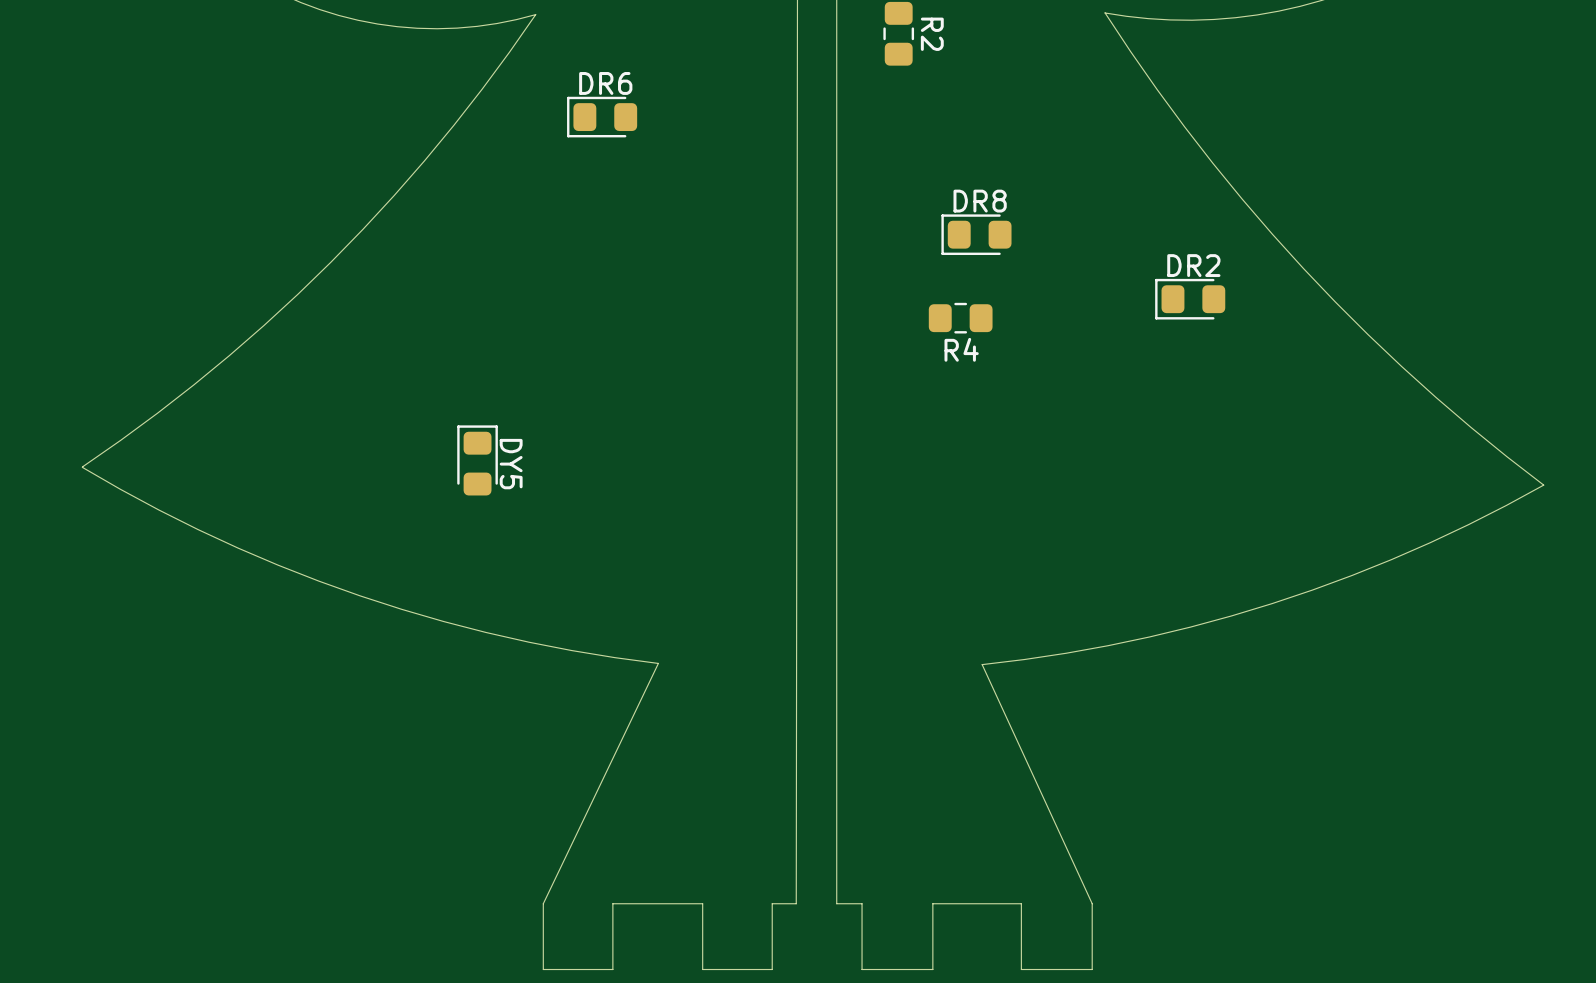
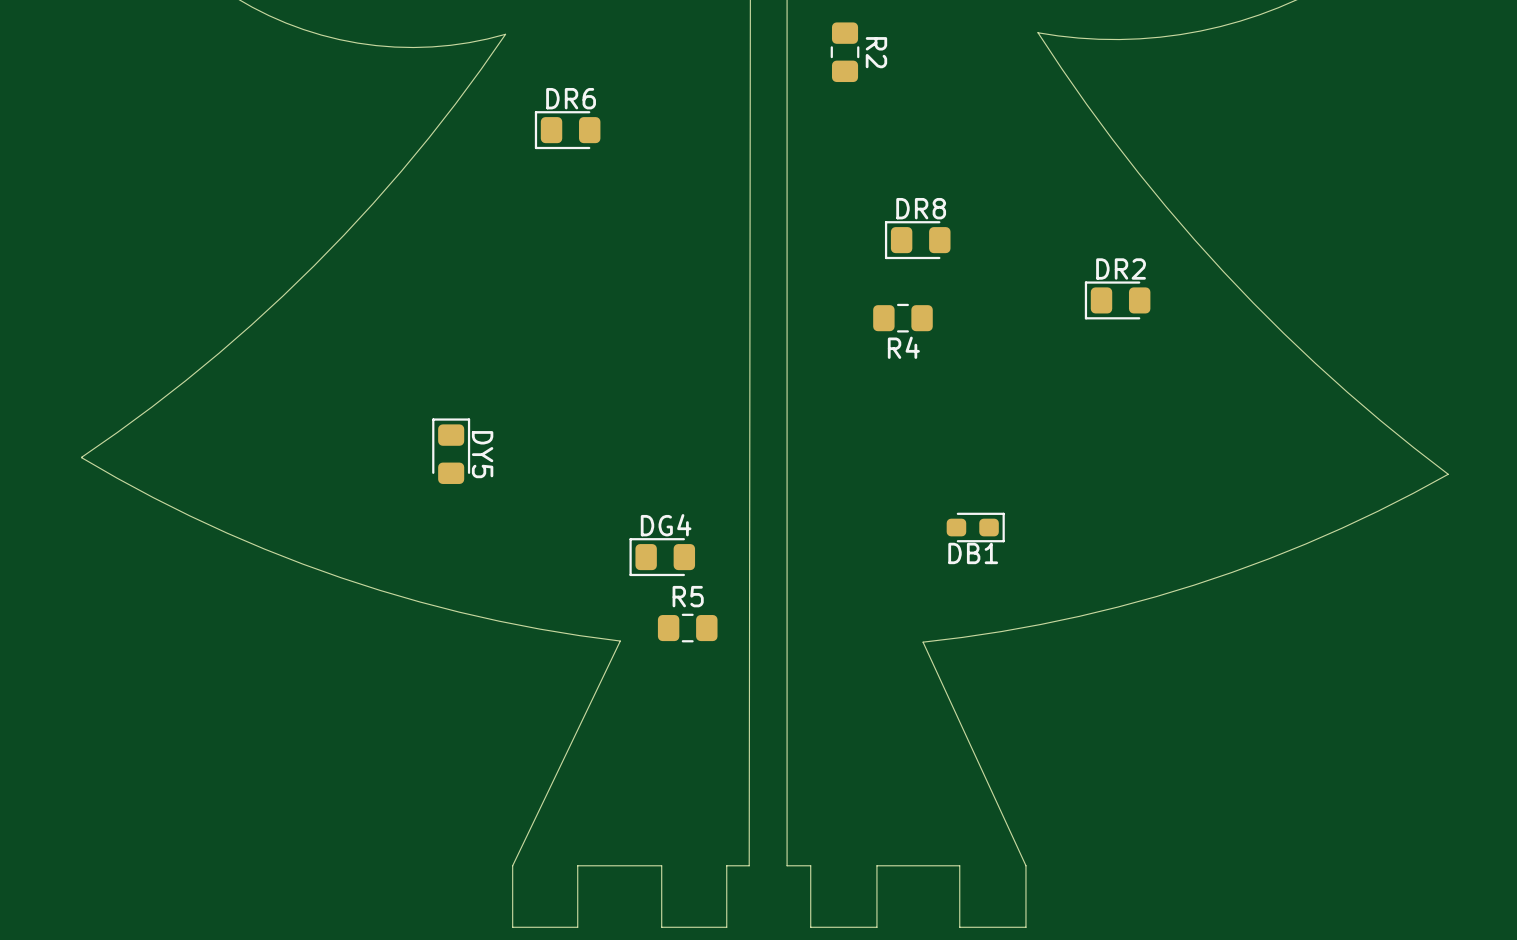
DB1: none -> (975, 527)
DG4: none -> (662, 557)
R5: none -> (687, 628)

